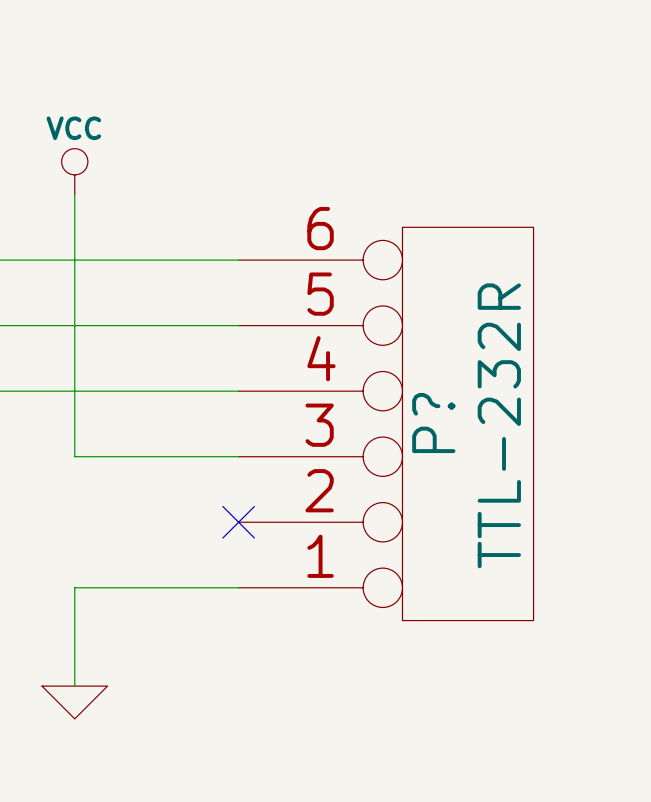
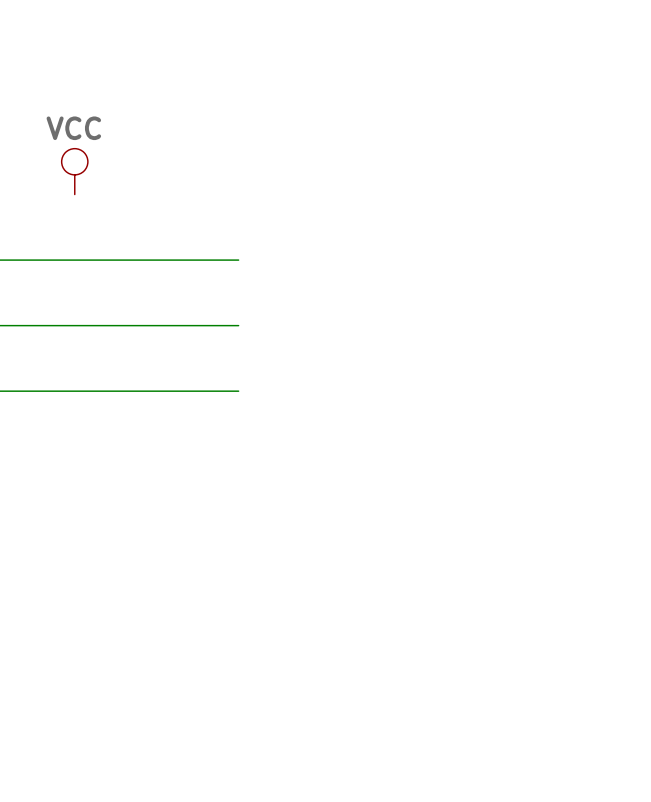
wire: (74, 194) (74, 456) (238, 456) -> none
P?: TTL-232R (386, 423) -> none
no-connect mark: (238, 522) -> none
wire: (238, 587) (74, 587) (74, 686) -> none
power symbol: (74, 702) -> none

